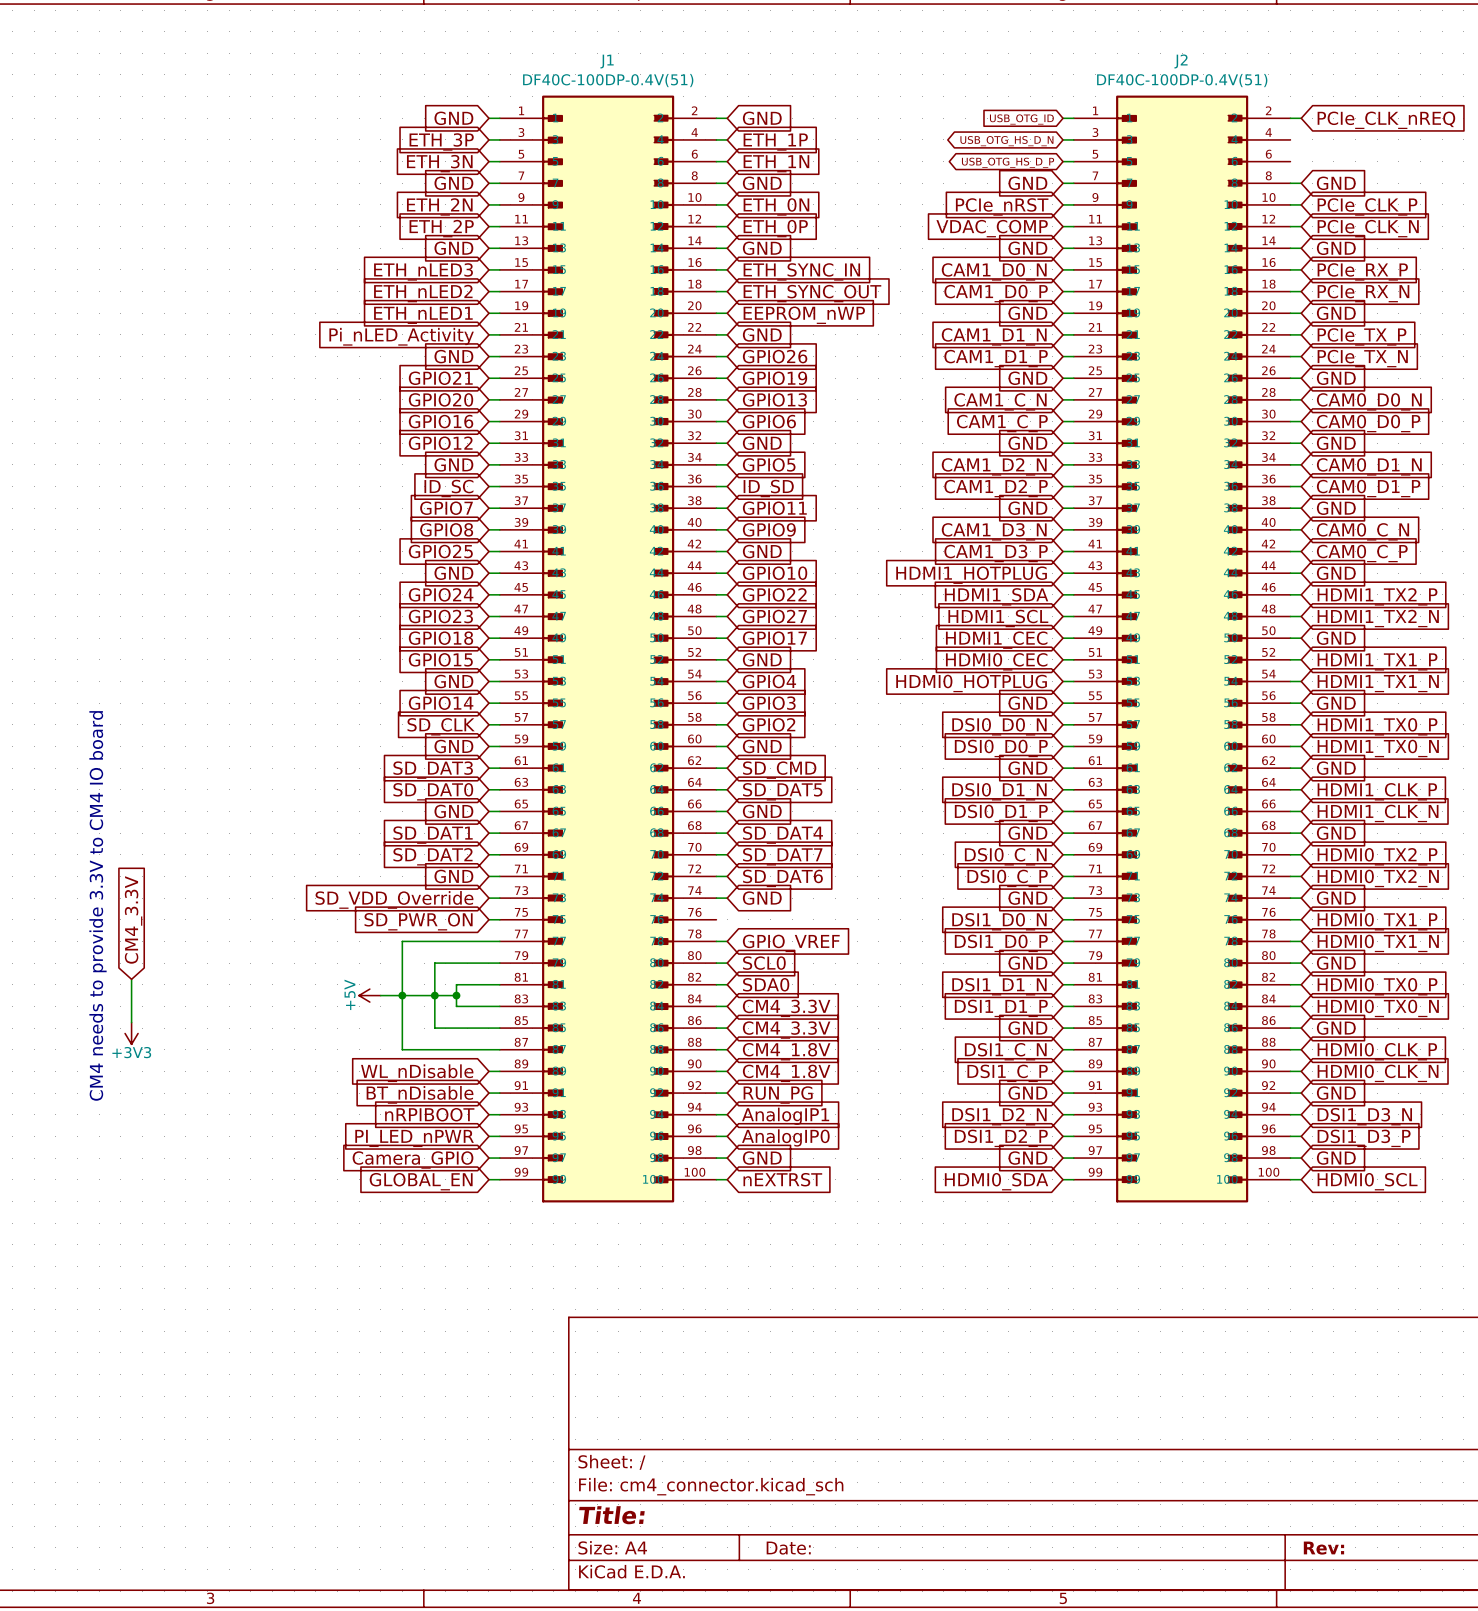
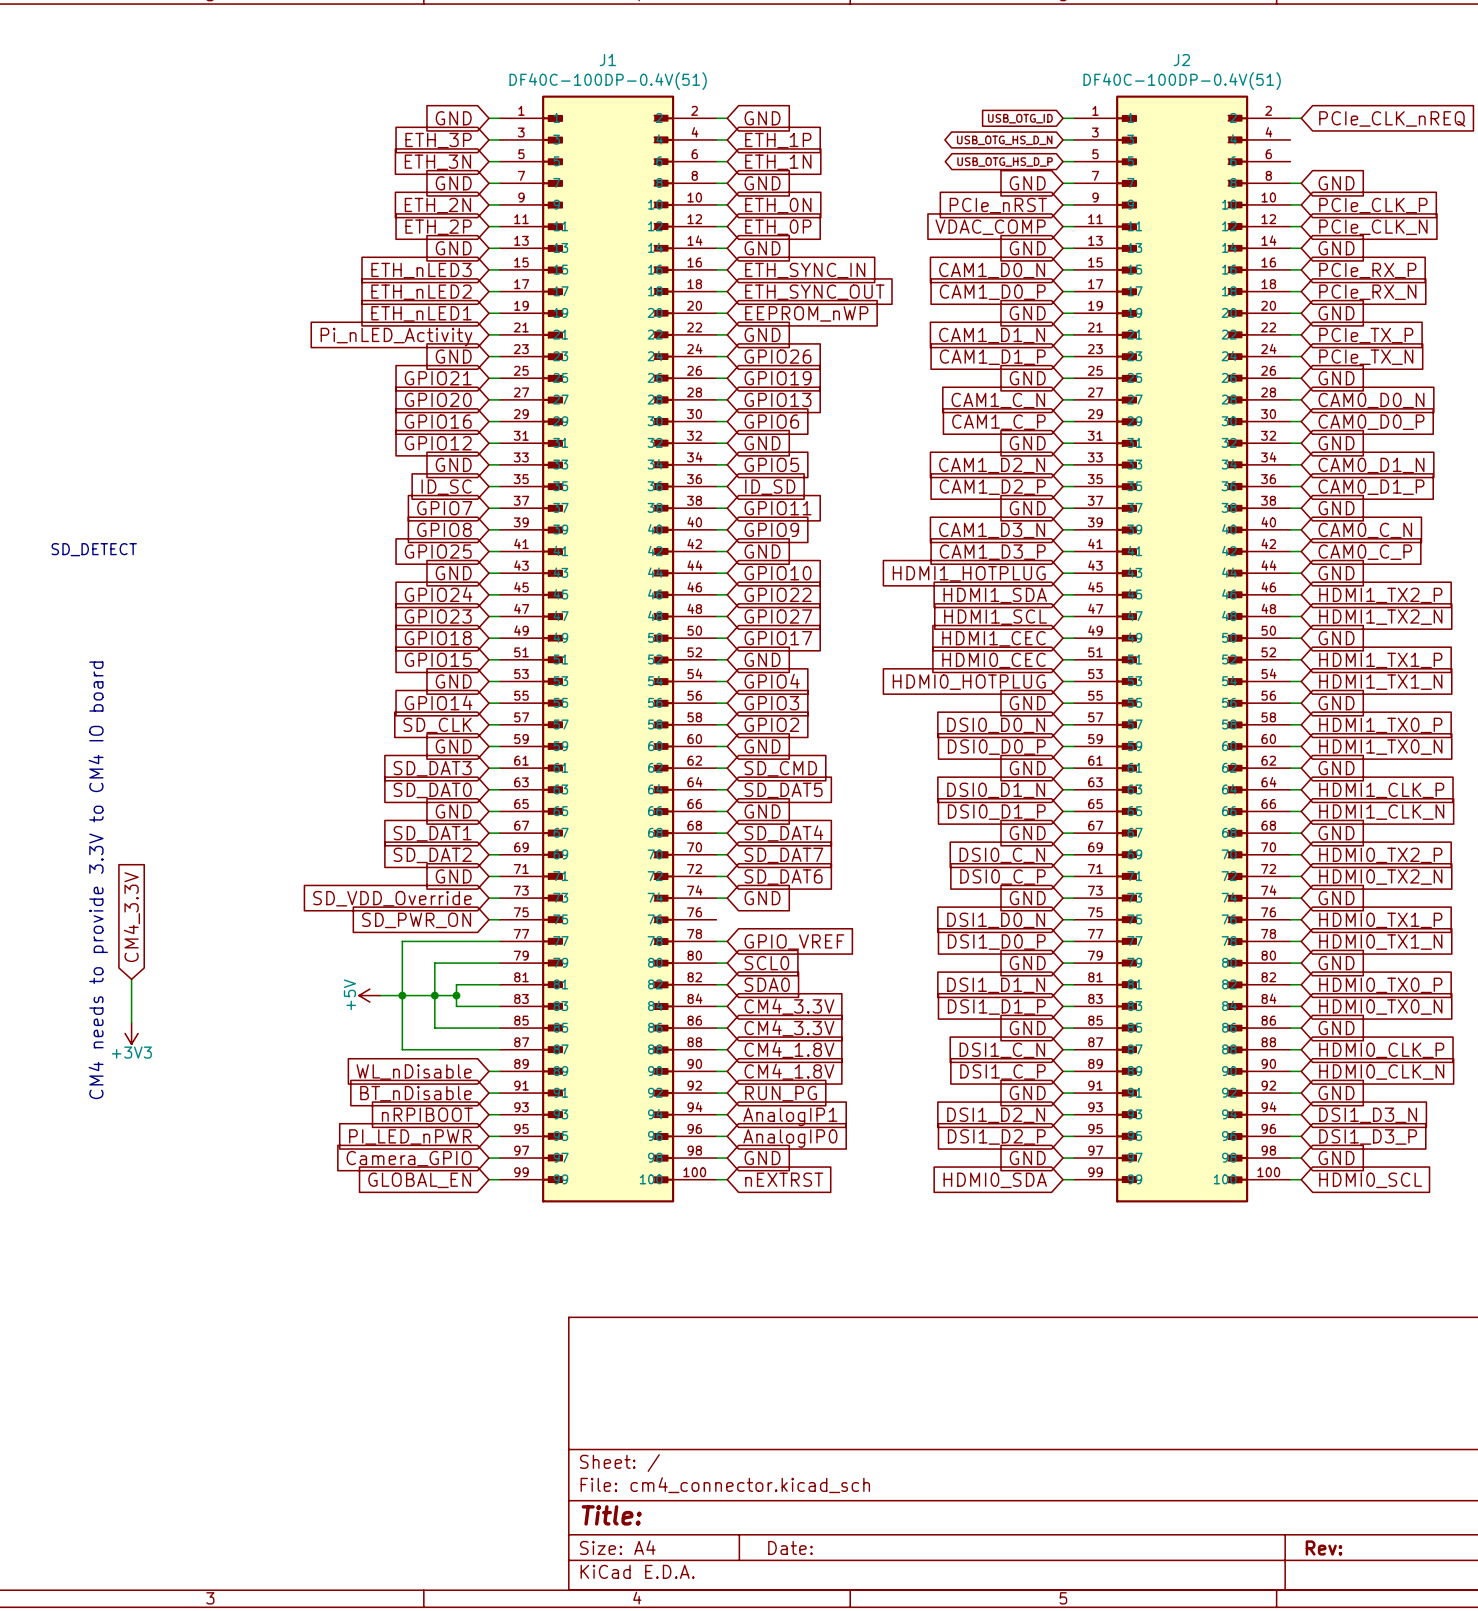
text: none -> SD_DETECT (94, 549)

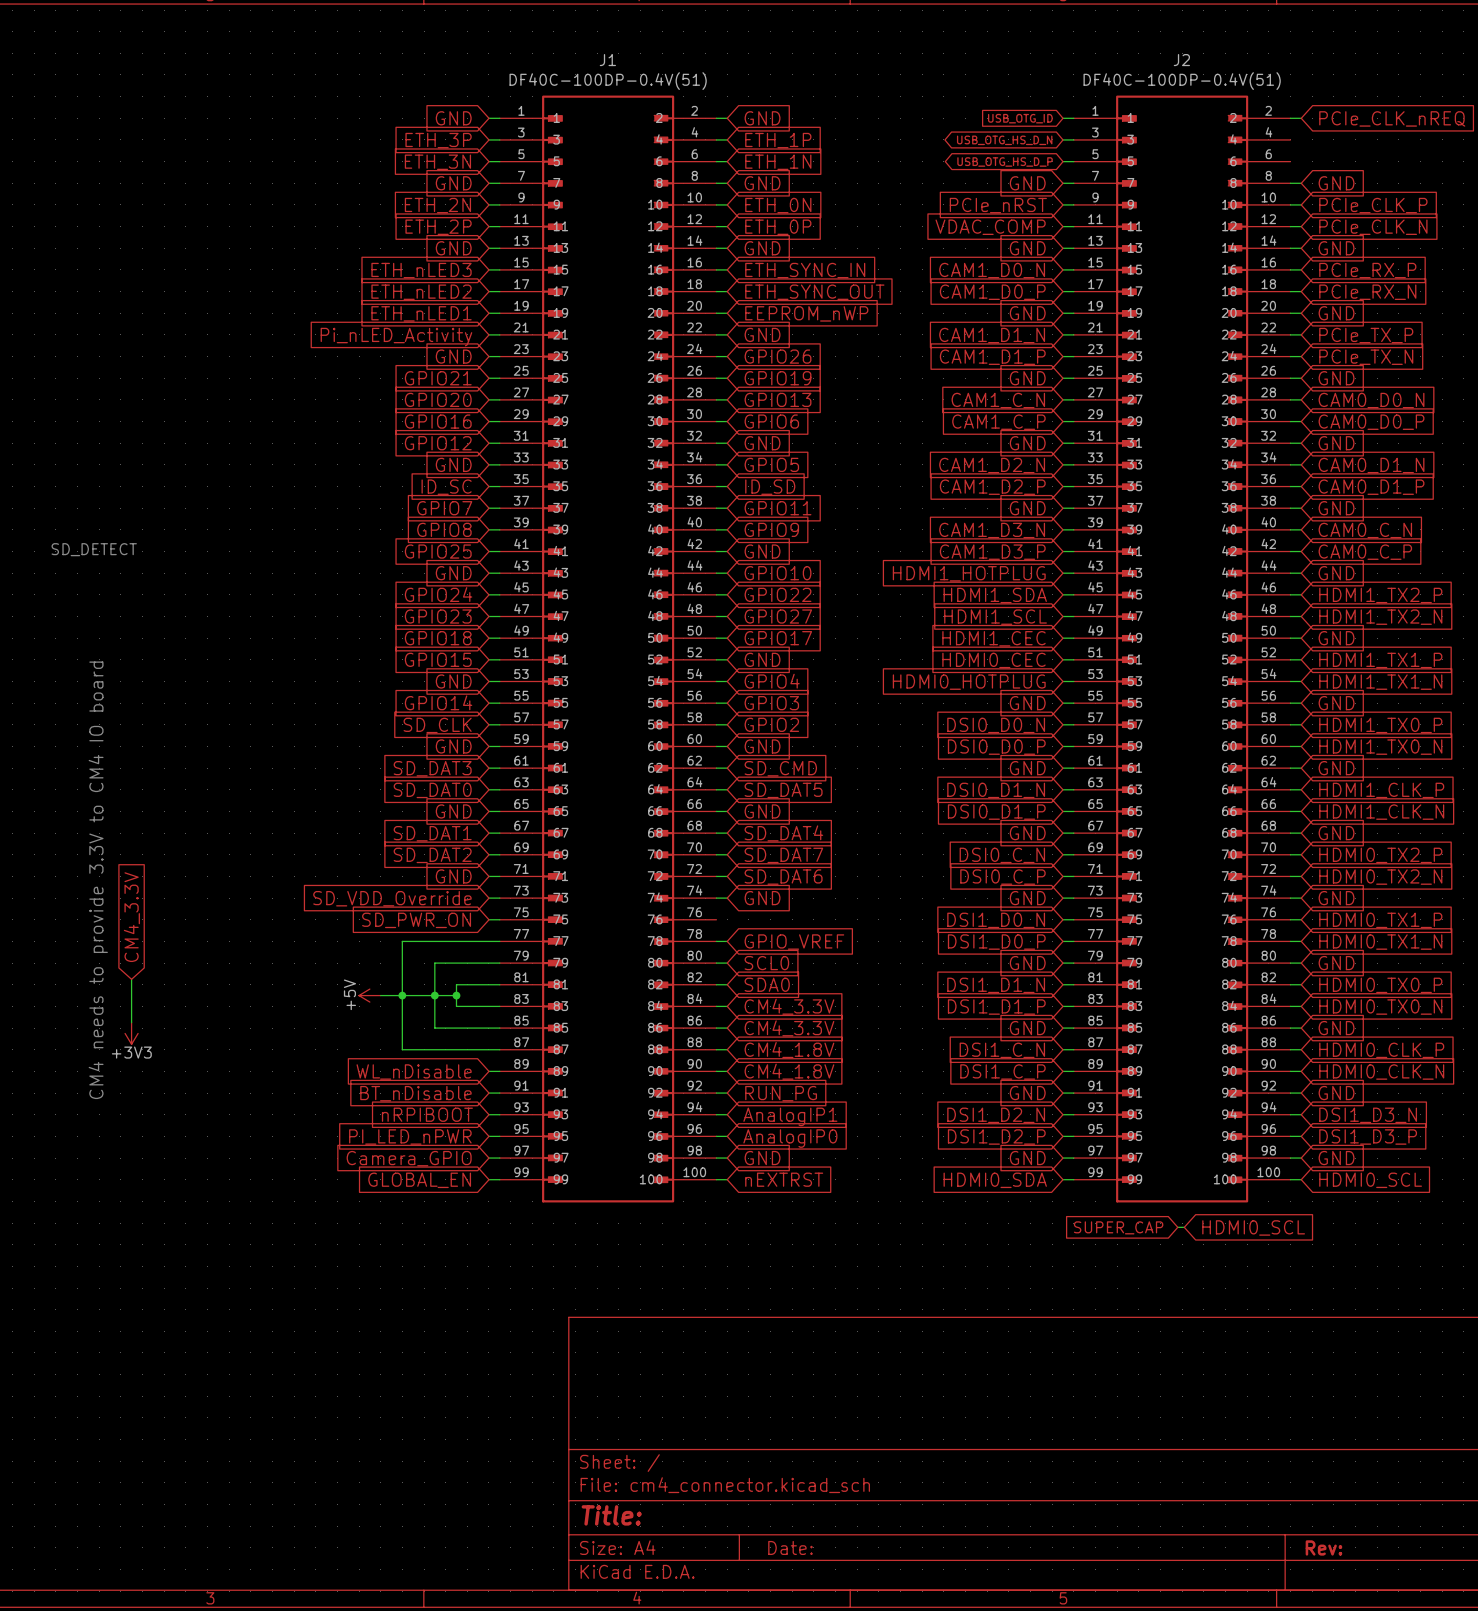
global label: none -> SUPER_CAP (1118, 1227)
wire: none -> (1177, 1227) (1184, 1227)
global label: none -> HDMI0_SCL (1253, 1227)

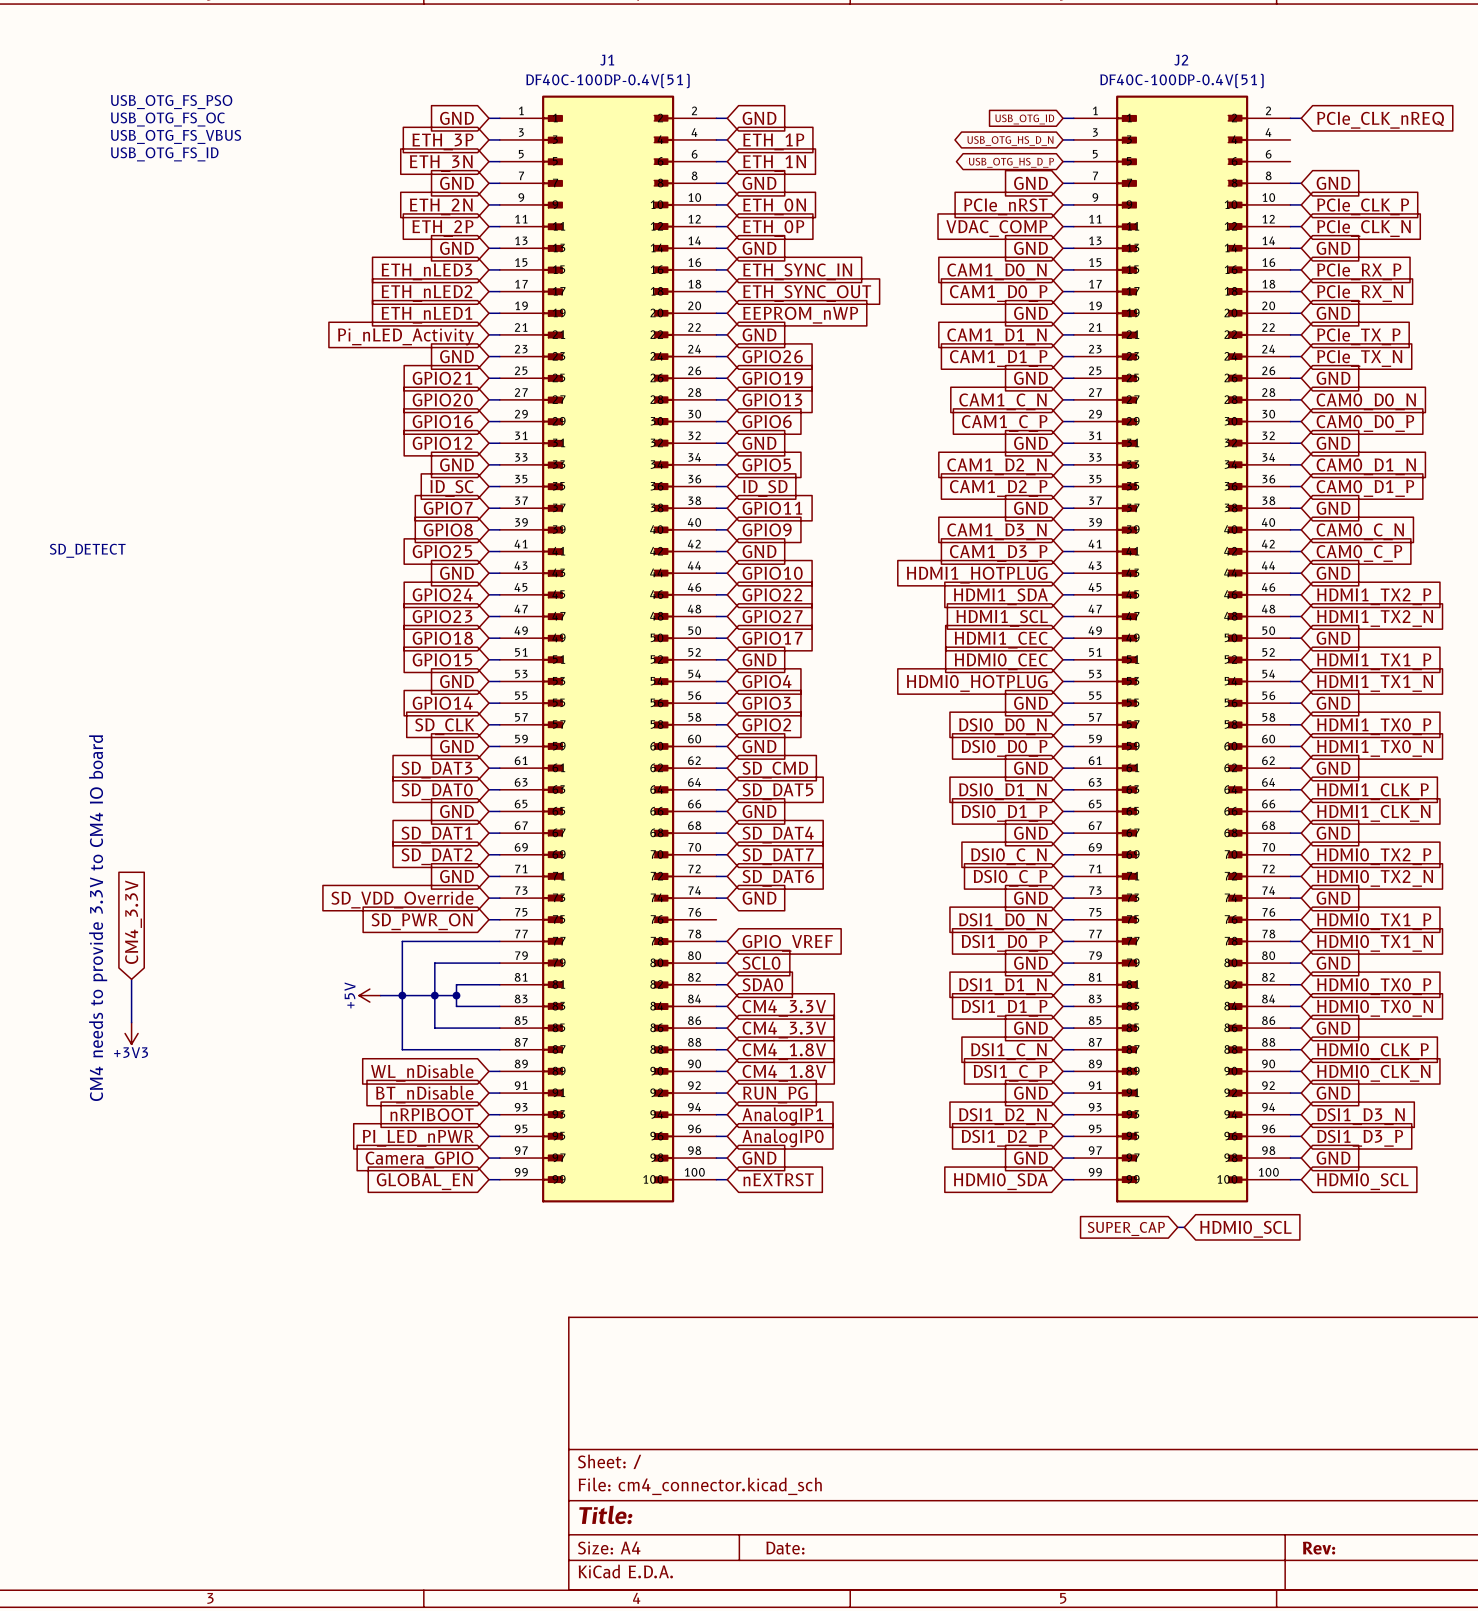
text: none -> USB_OTG_FS_PSO (171, 102)
text: none -> USB_OTG_FS_OC (167, 119)
text: none -> USB_OTG_FS_VBUS (176, 136)
text: none -> USB_OTG_FS_ID (164, 154)

